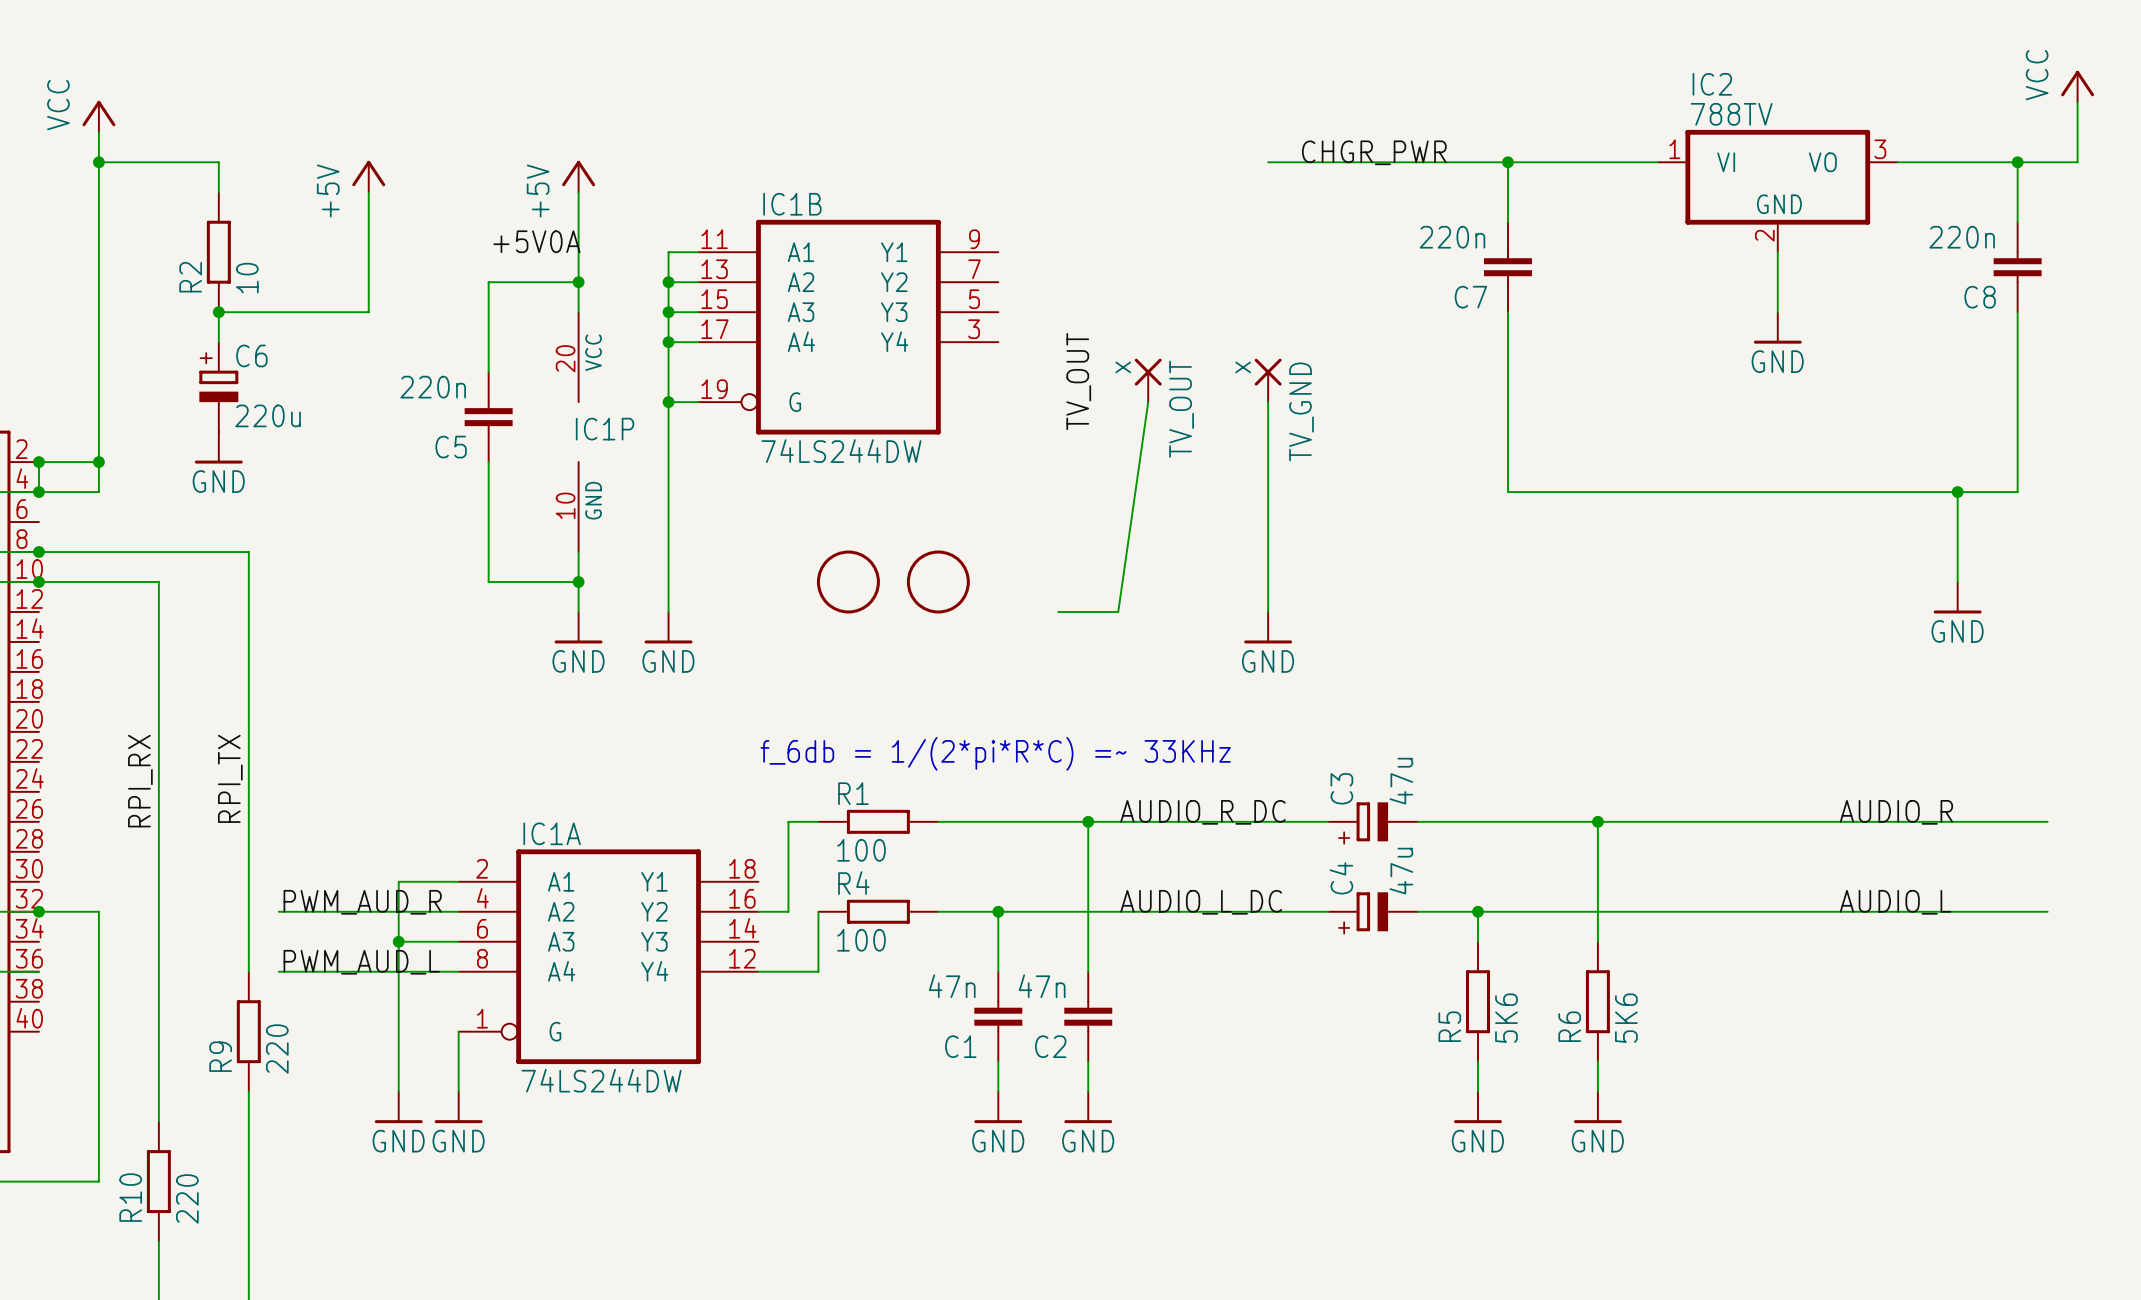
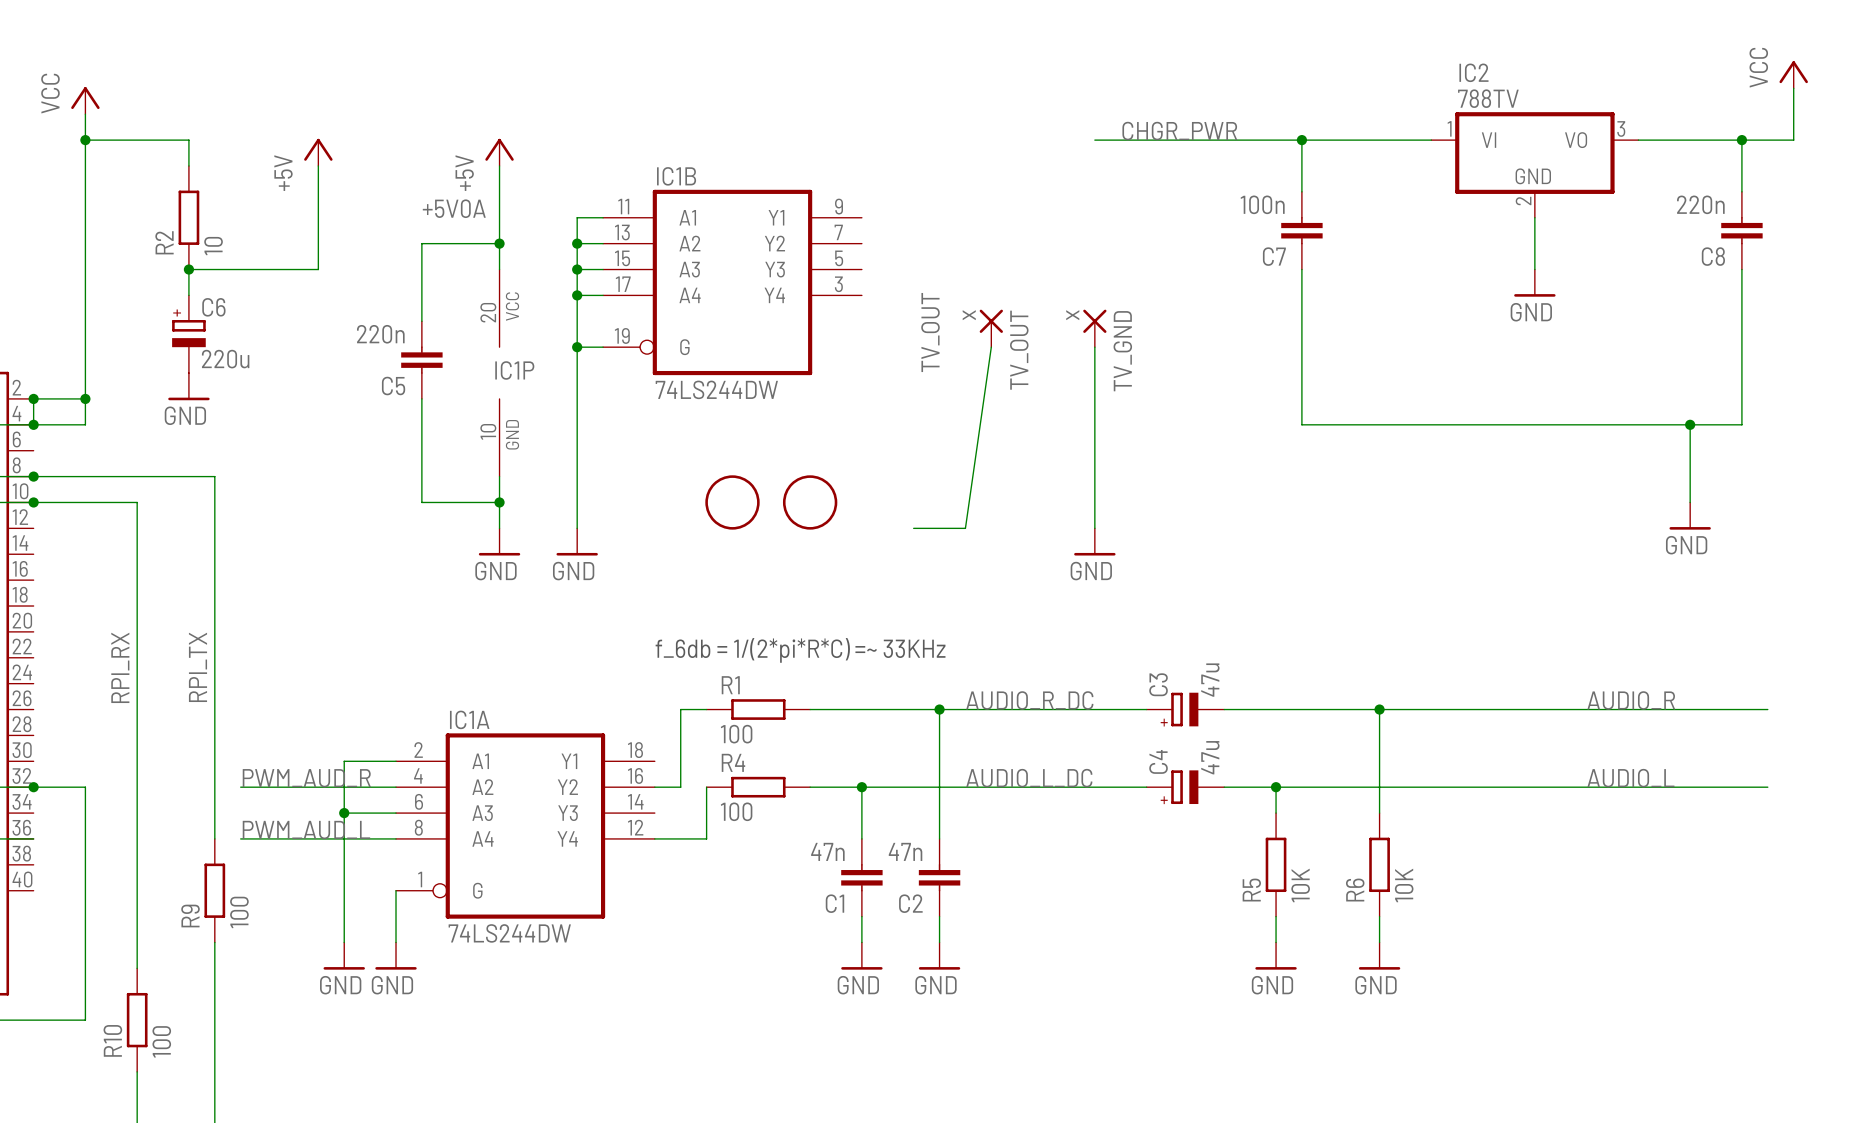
C7 value: 220n (1452, 237) -> 100n (1262, 204)
R5 value: 5K6 (1506, 1018) -> 10K (1300, 885)
R6 value: 5K6 (1626, 1018) -> 10K (1404, 885)
R9 value: 220 (277, 1049) -> 100 (239, 912)
R10 value: 220 (187, 1198) -> 100 (161, 1041)

